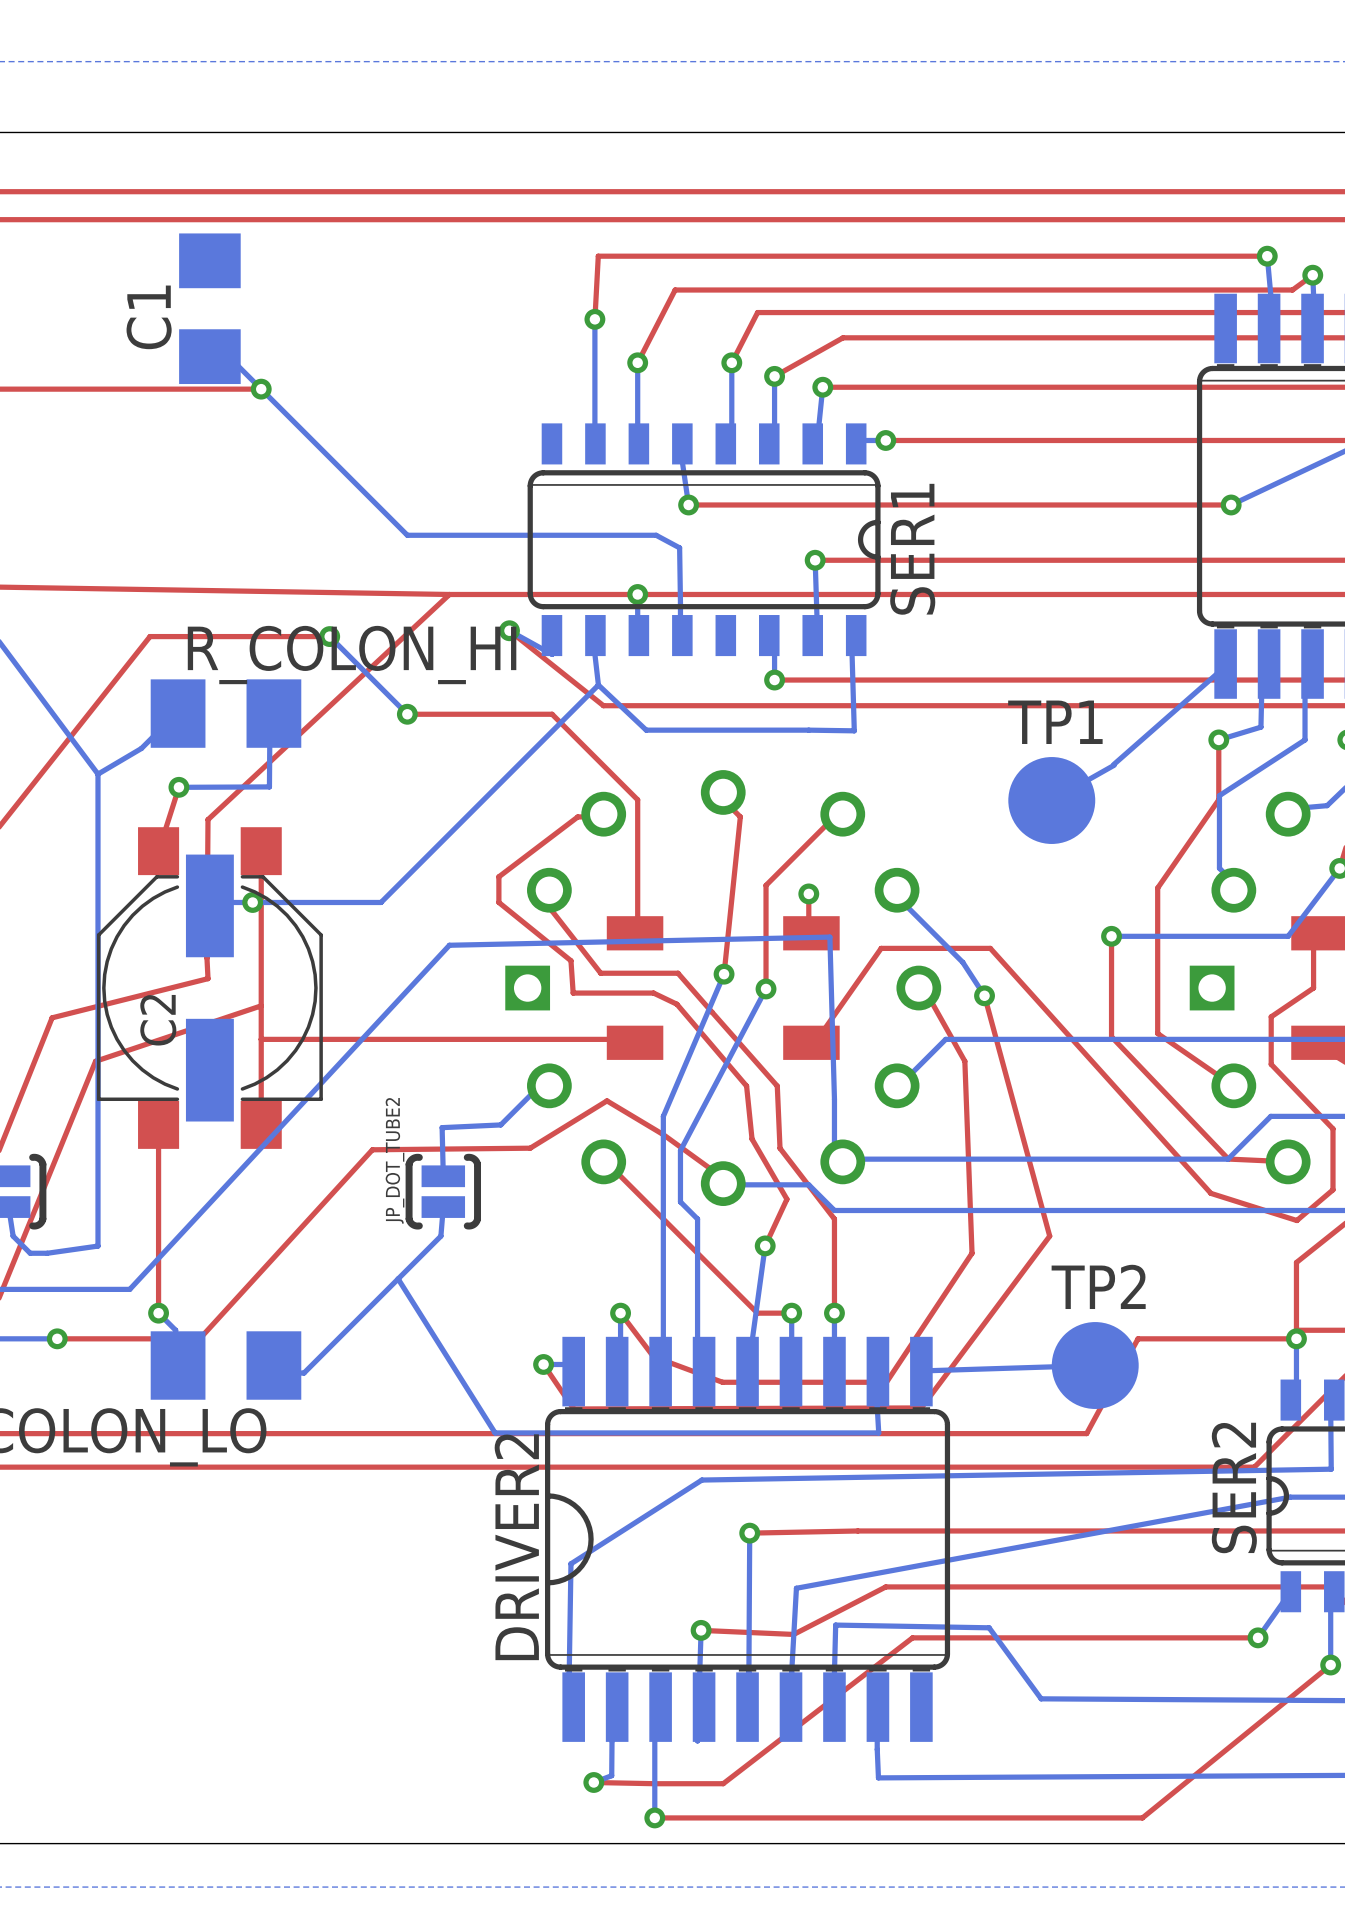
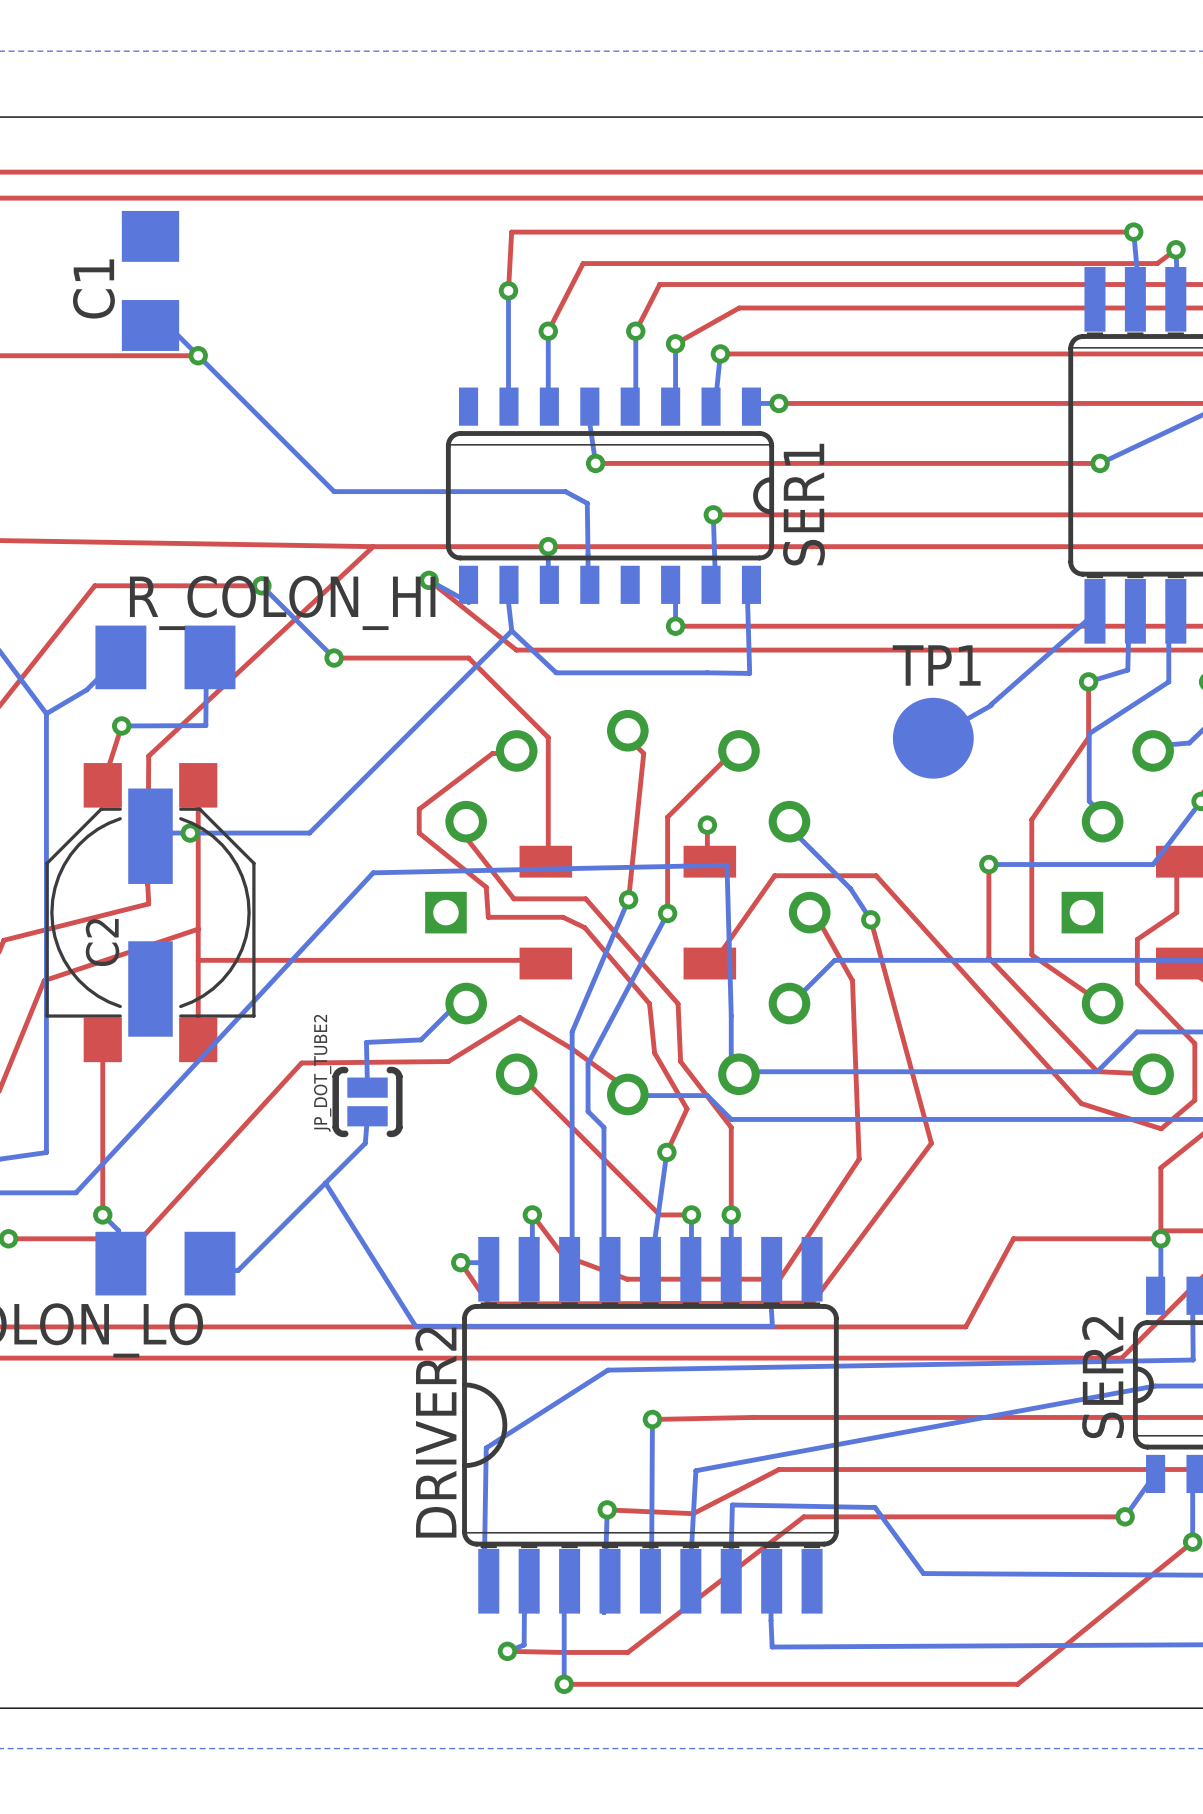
bottom track: (1095, 1365) (921, 1370) -> none
TP2: (1095, 1365) -> none

